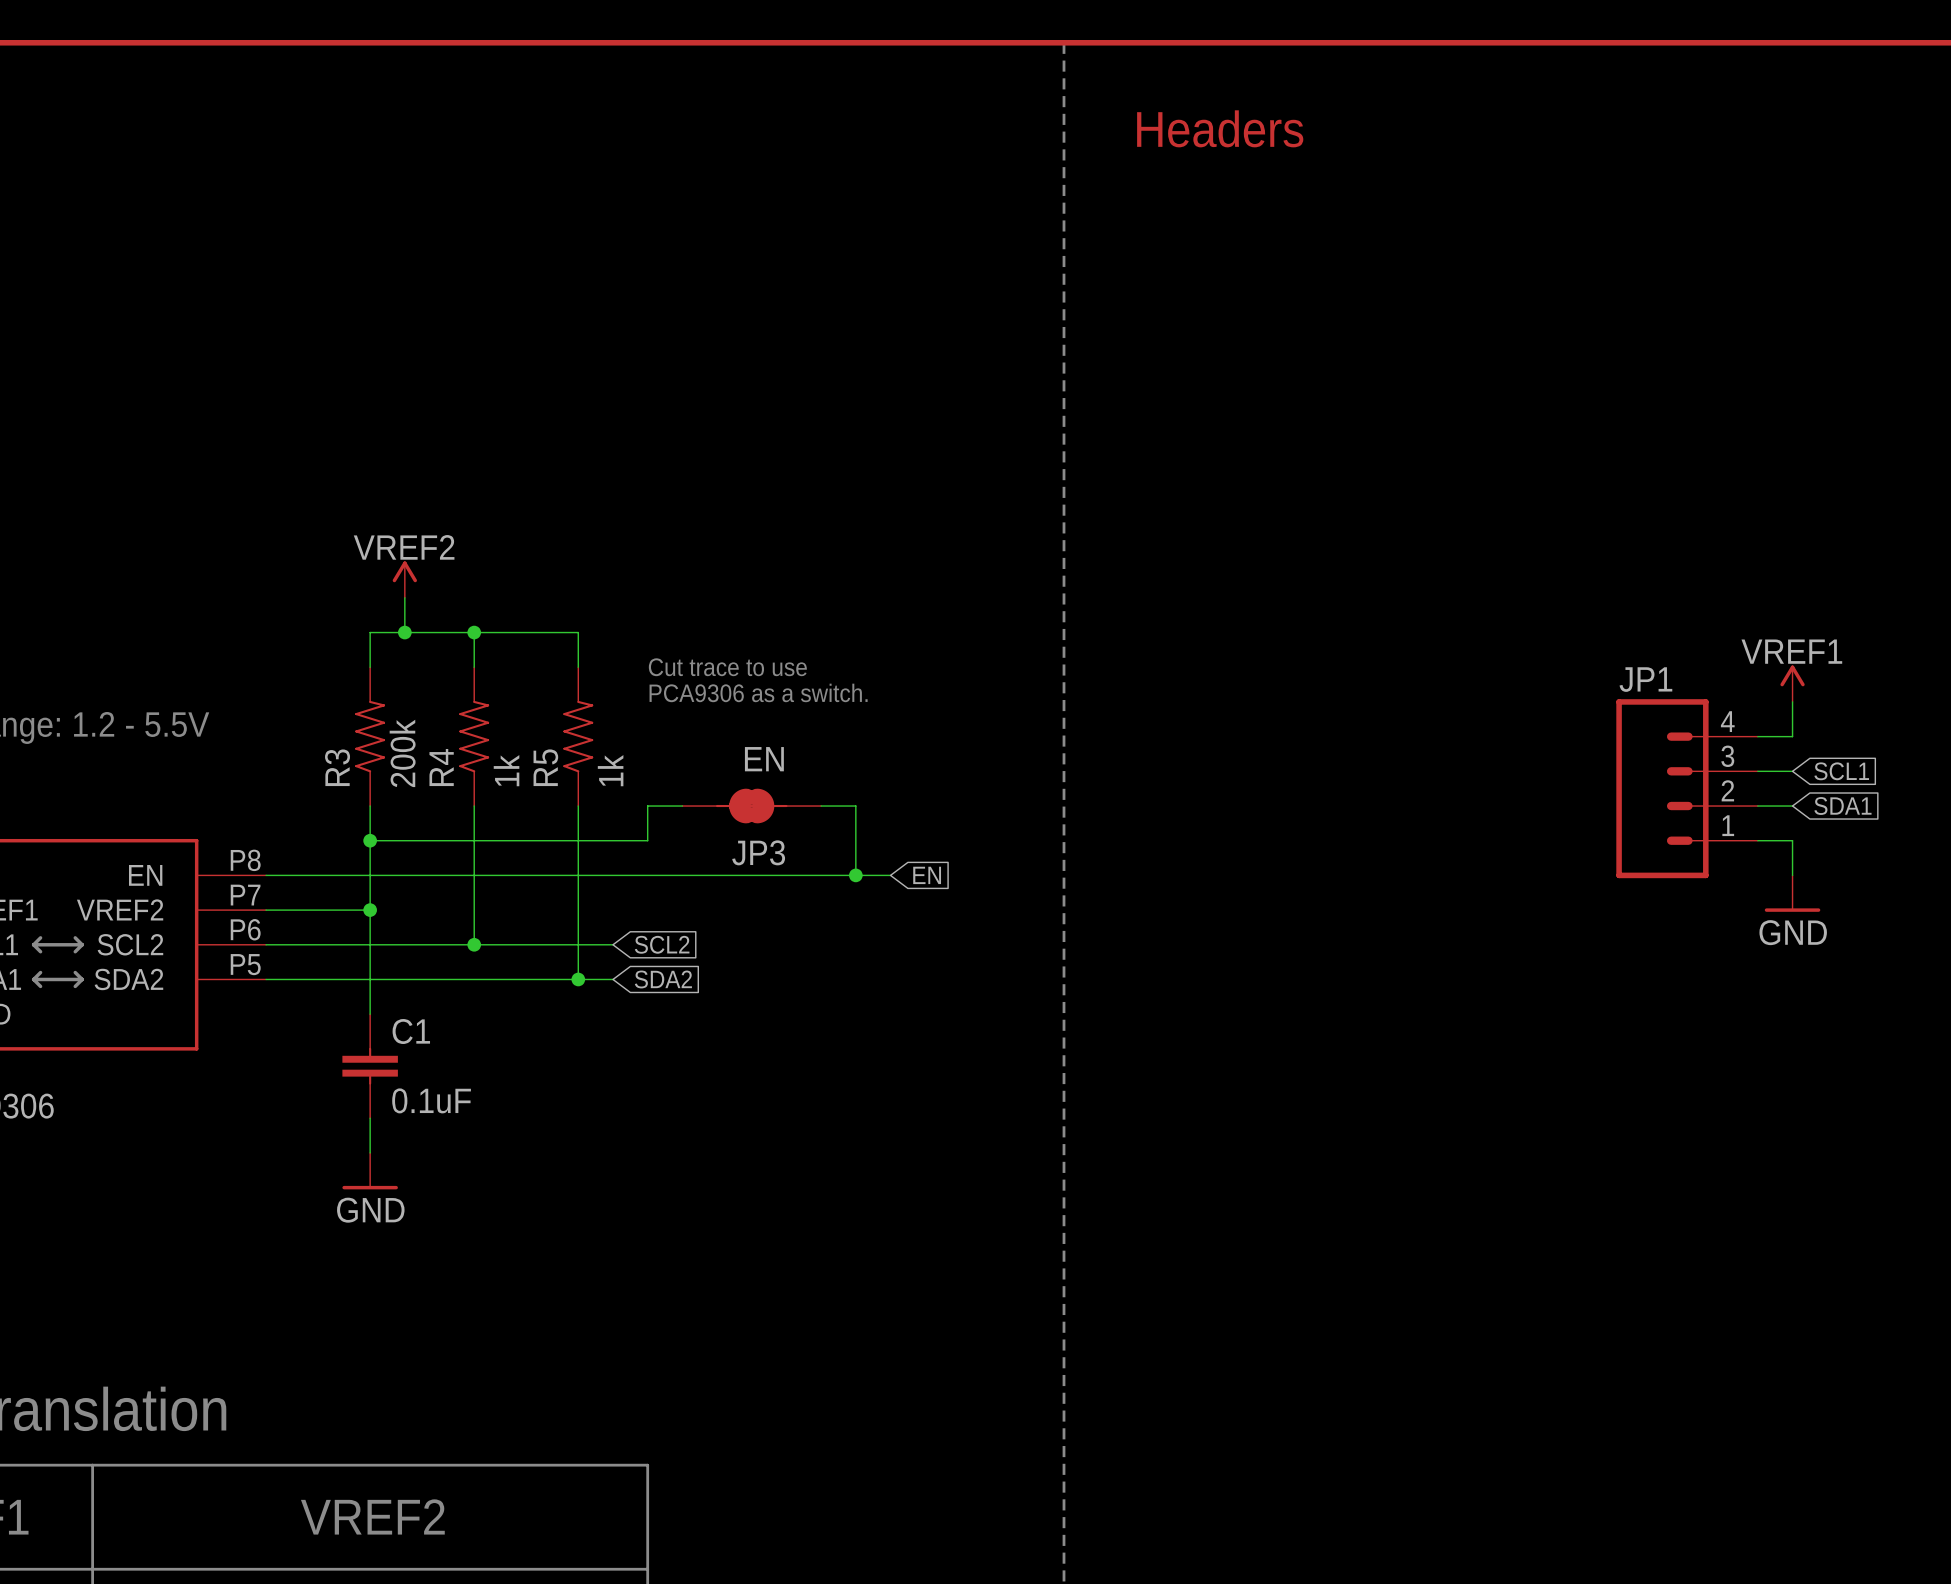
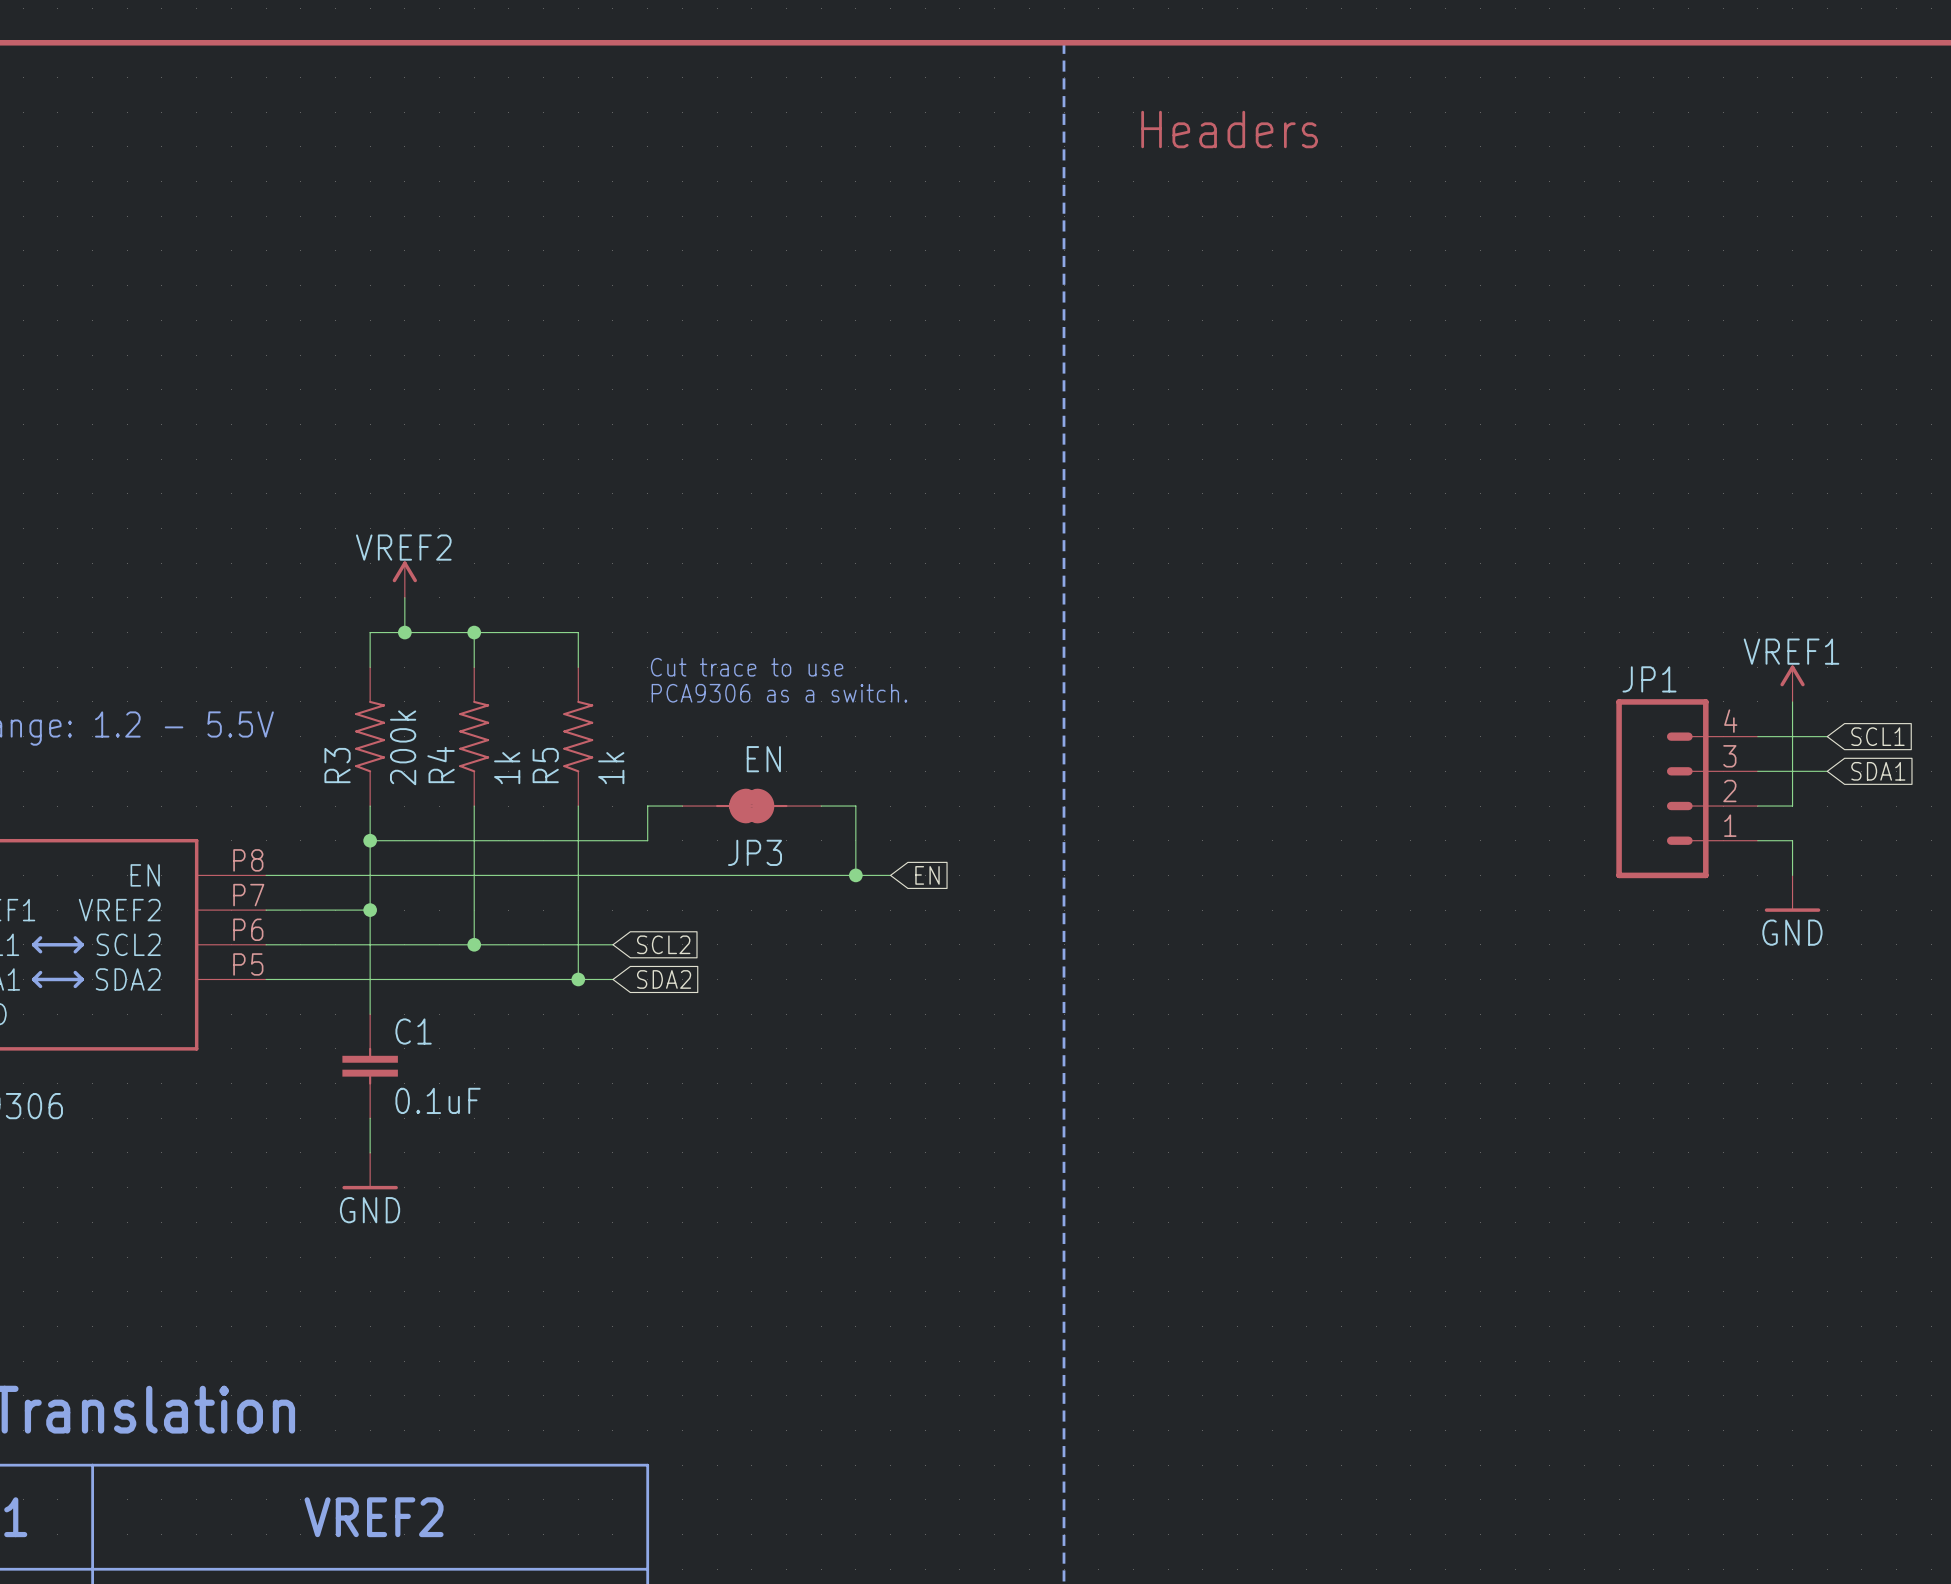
wire: none -> (1827, 736) (1792, 736) (1792, 806)
wire: none -> (1792, 771) (1827, 771)
global label position: SCL1 (1841, 771) -> SCL1 (1877, 736)
global label position: SDA1 (1842, 806) -> SDA1 (1878, 771)

